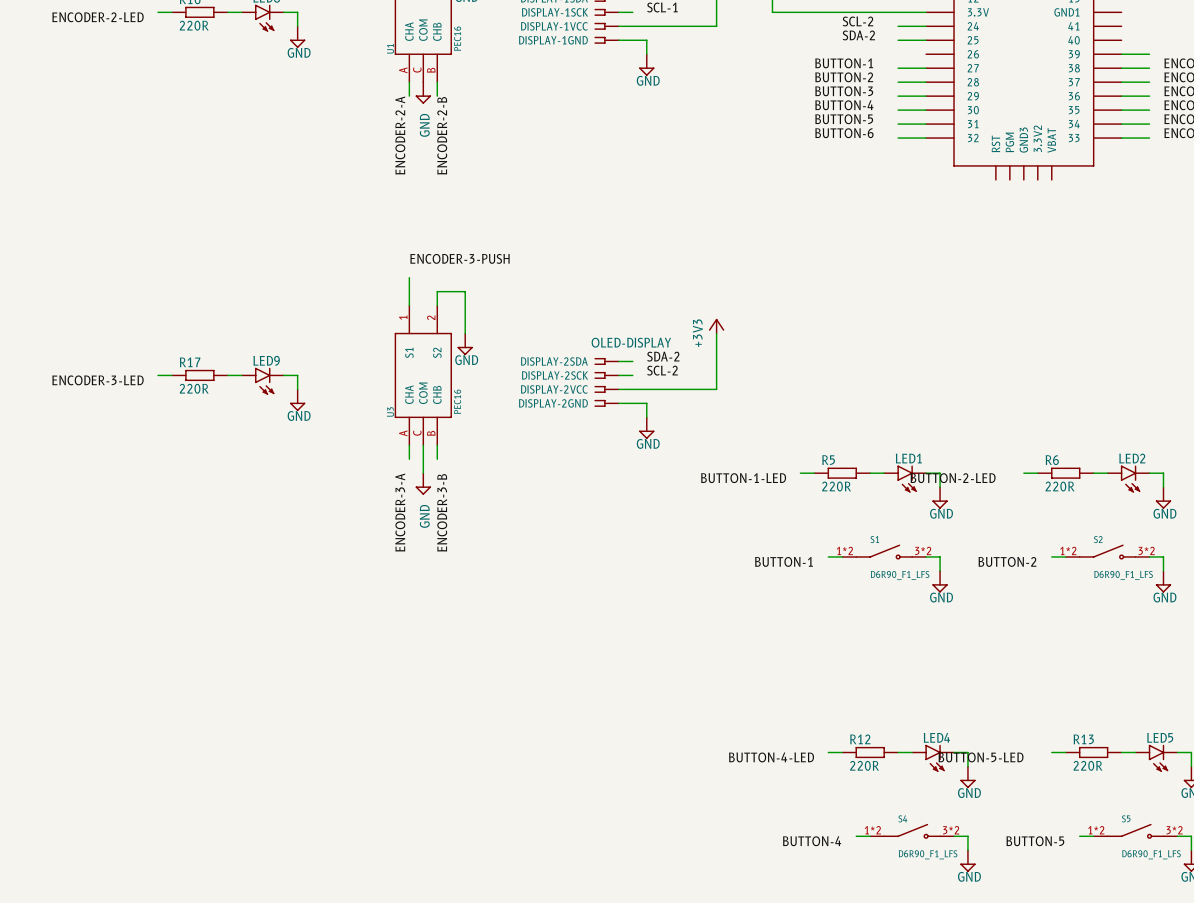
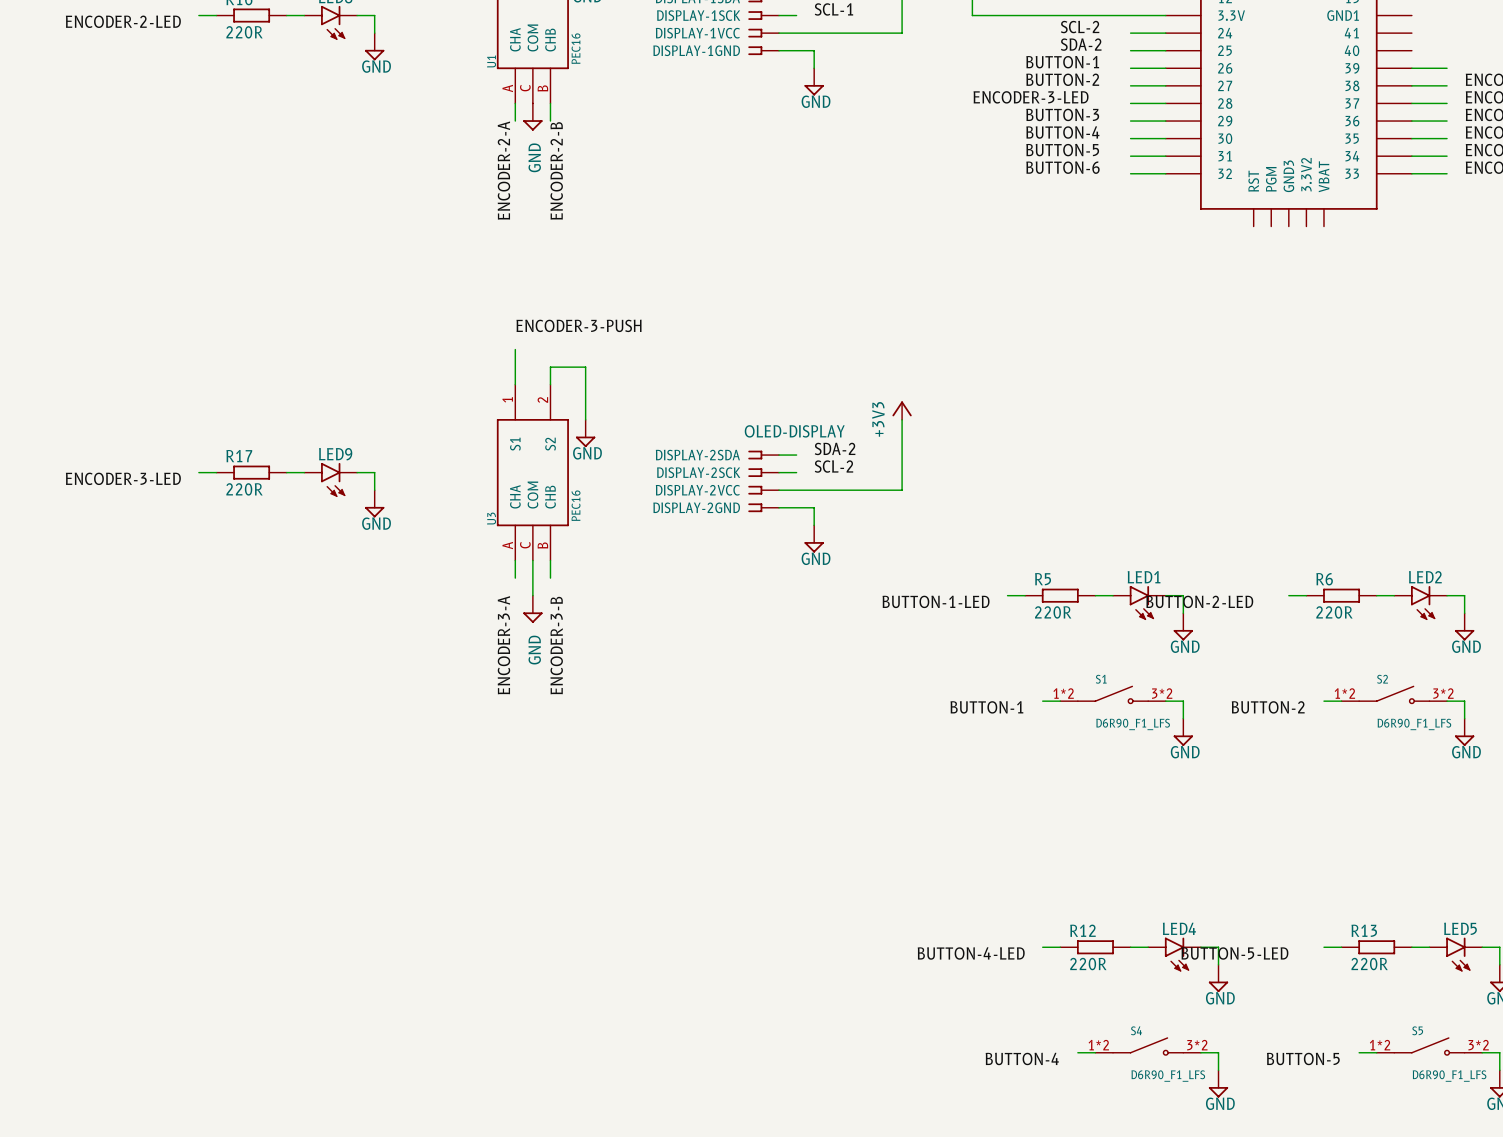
label: none -> BUTTON-1 (1062, 62)
wire: none -> (1130, 68) (1165, 68)
label: BUTTON-1 (844, 63) -> BUTTON-2 (1062, 79)
label: none -> ENCODER-3-LED (1031, 97)
label: BUTTON-2 (844, 77) -> none

